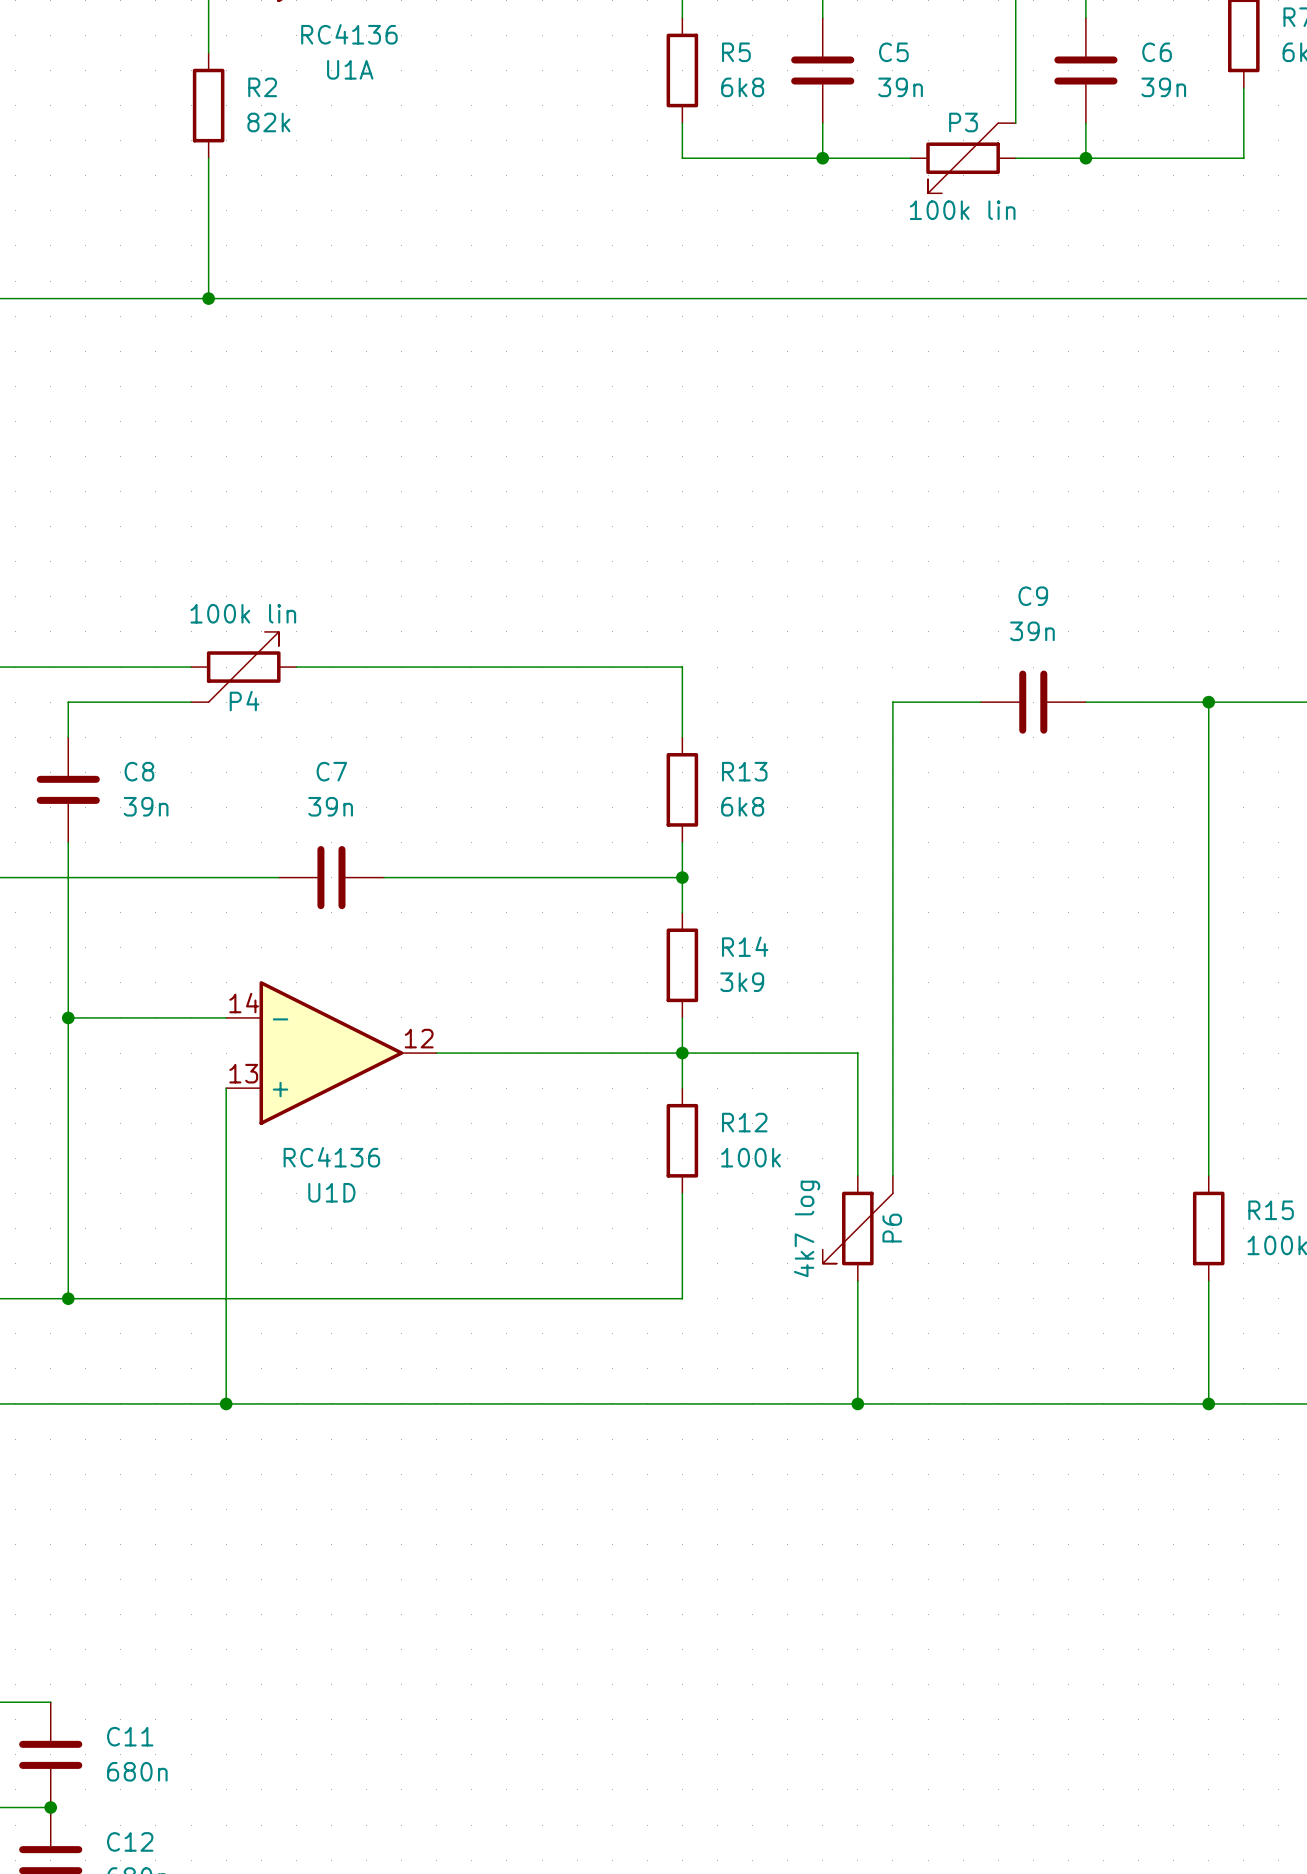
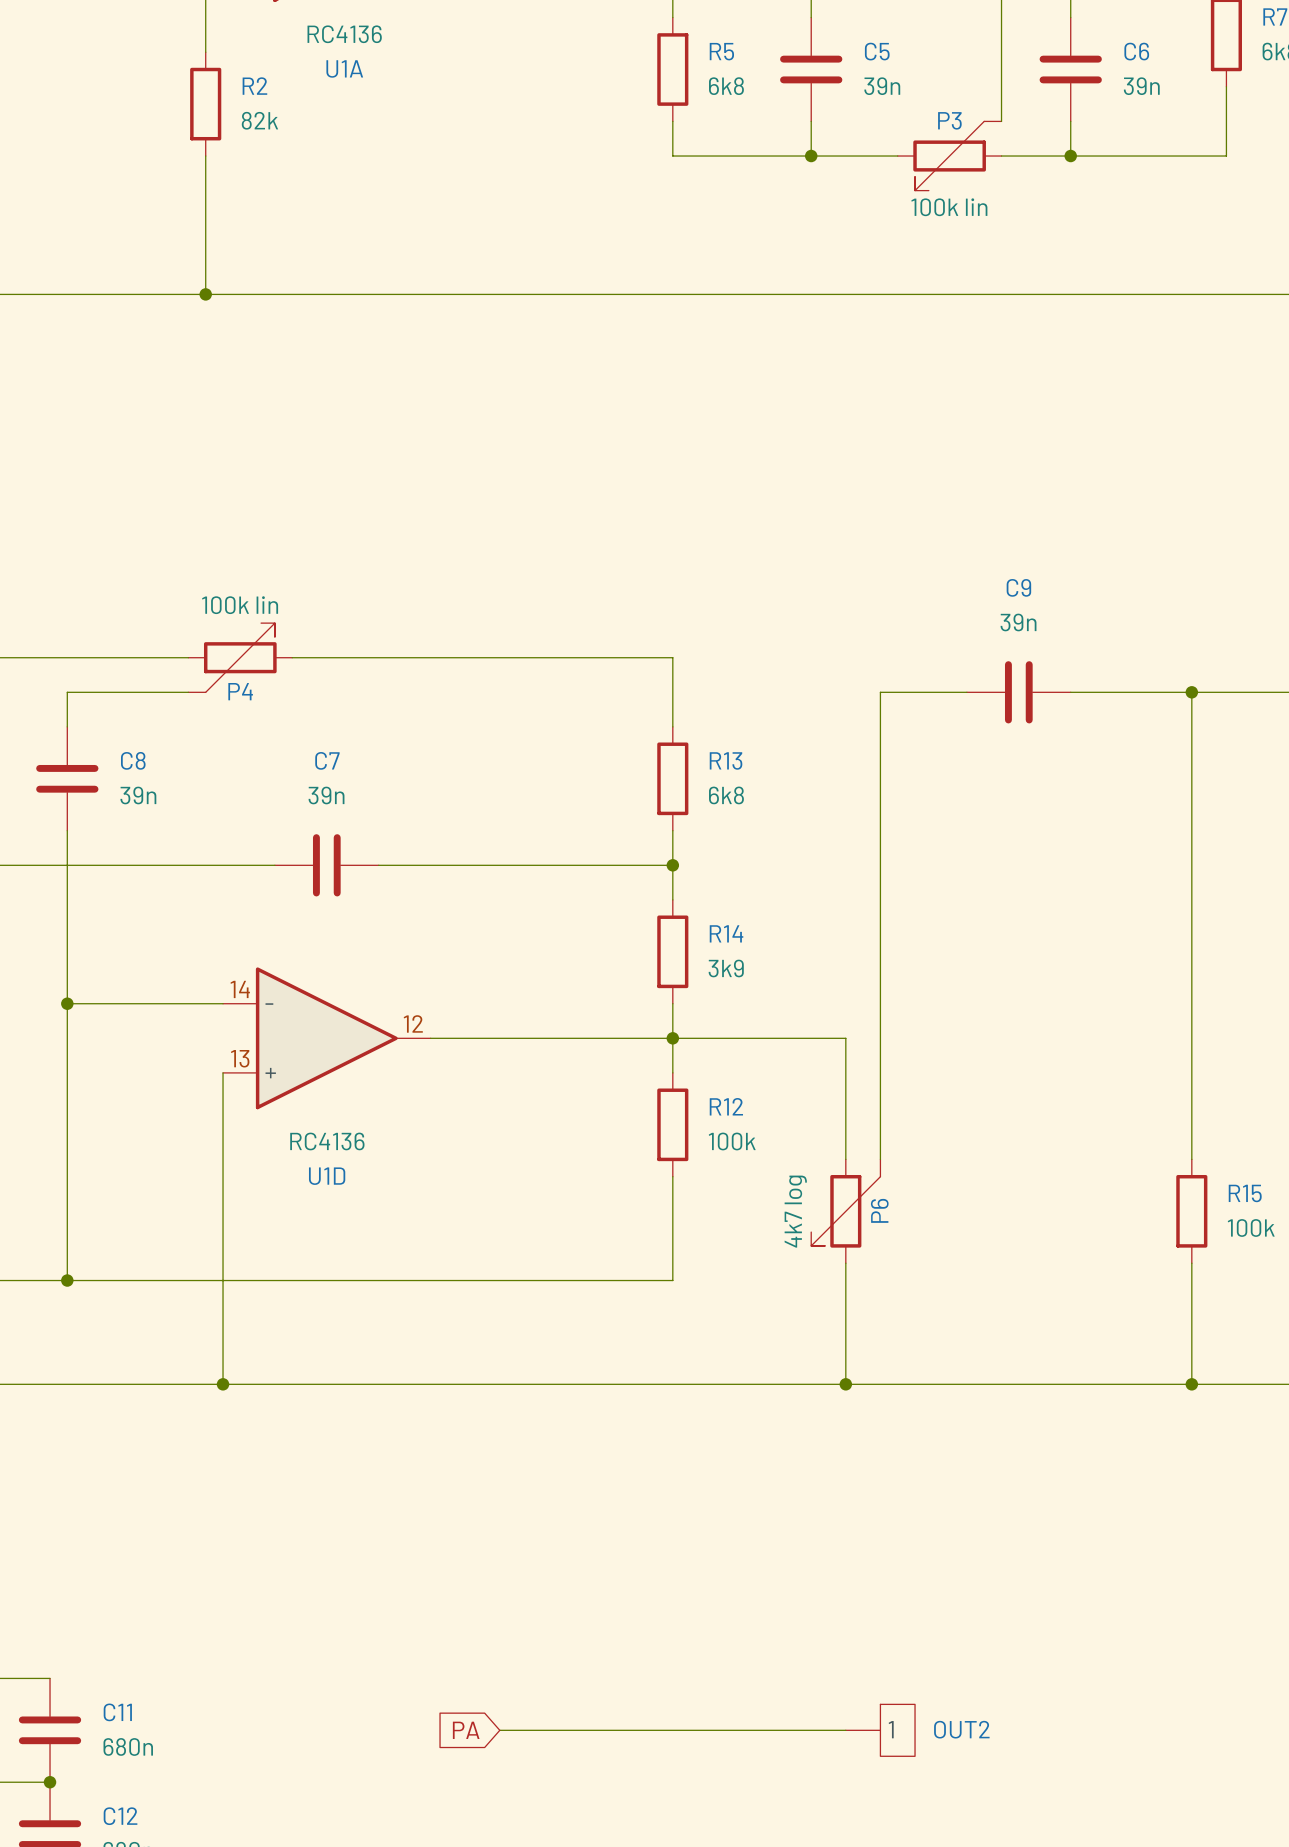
global label: none -> PA (466, 1730)
wire: none -> (499, 1730) (845, 1730)
OUT2: none -> (880, 1730)

